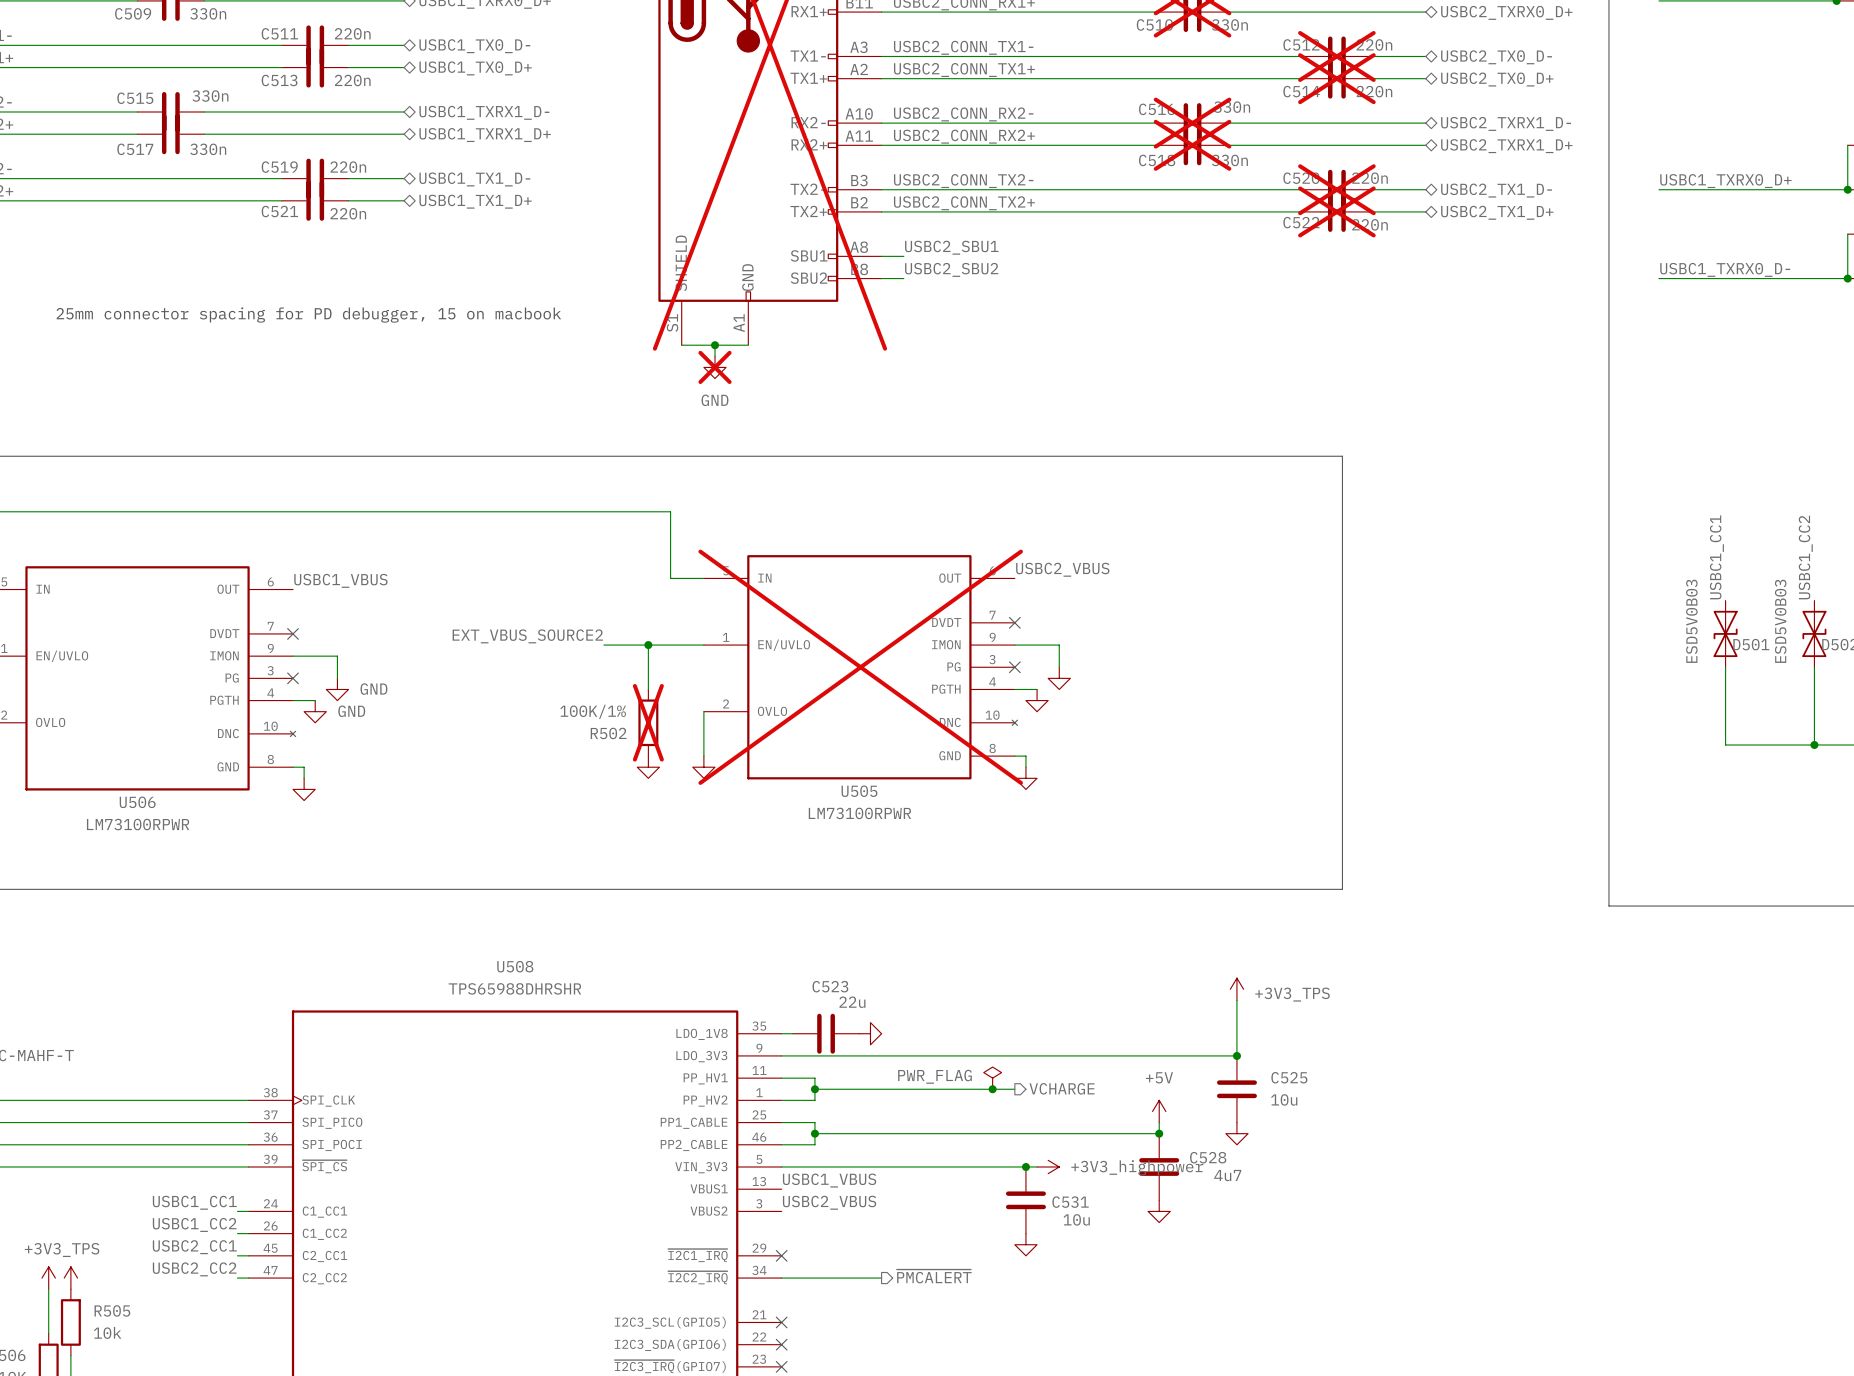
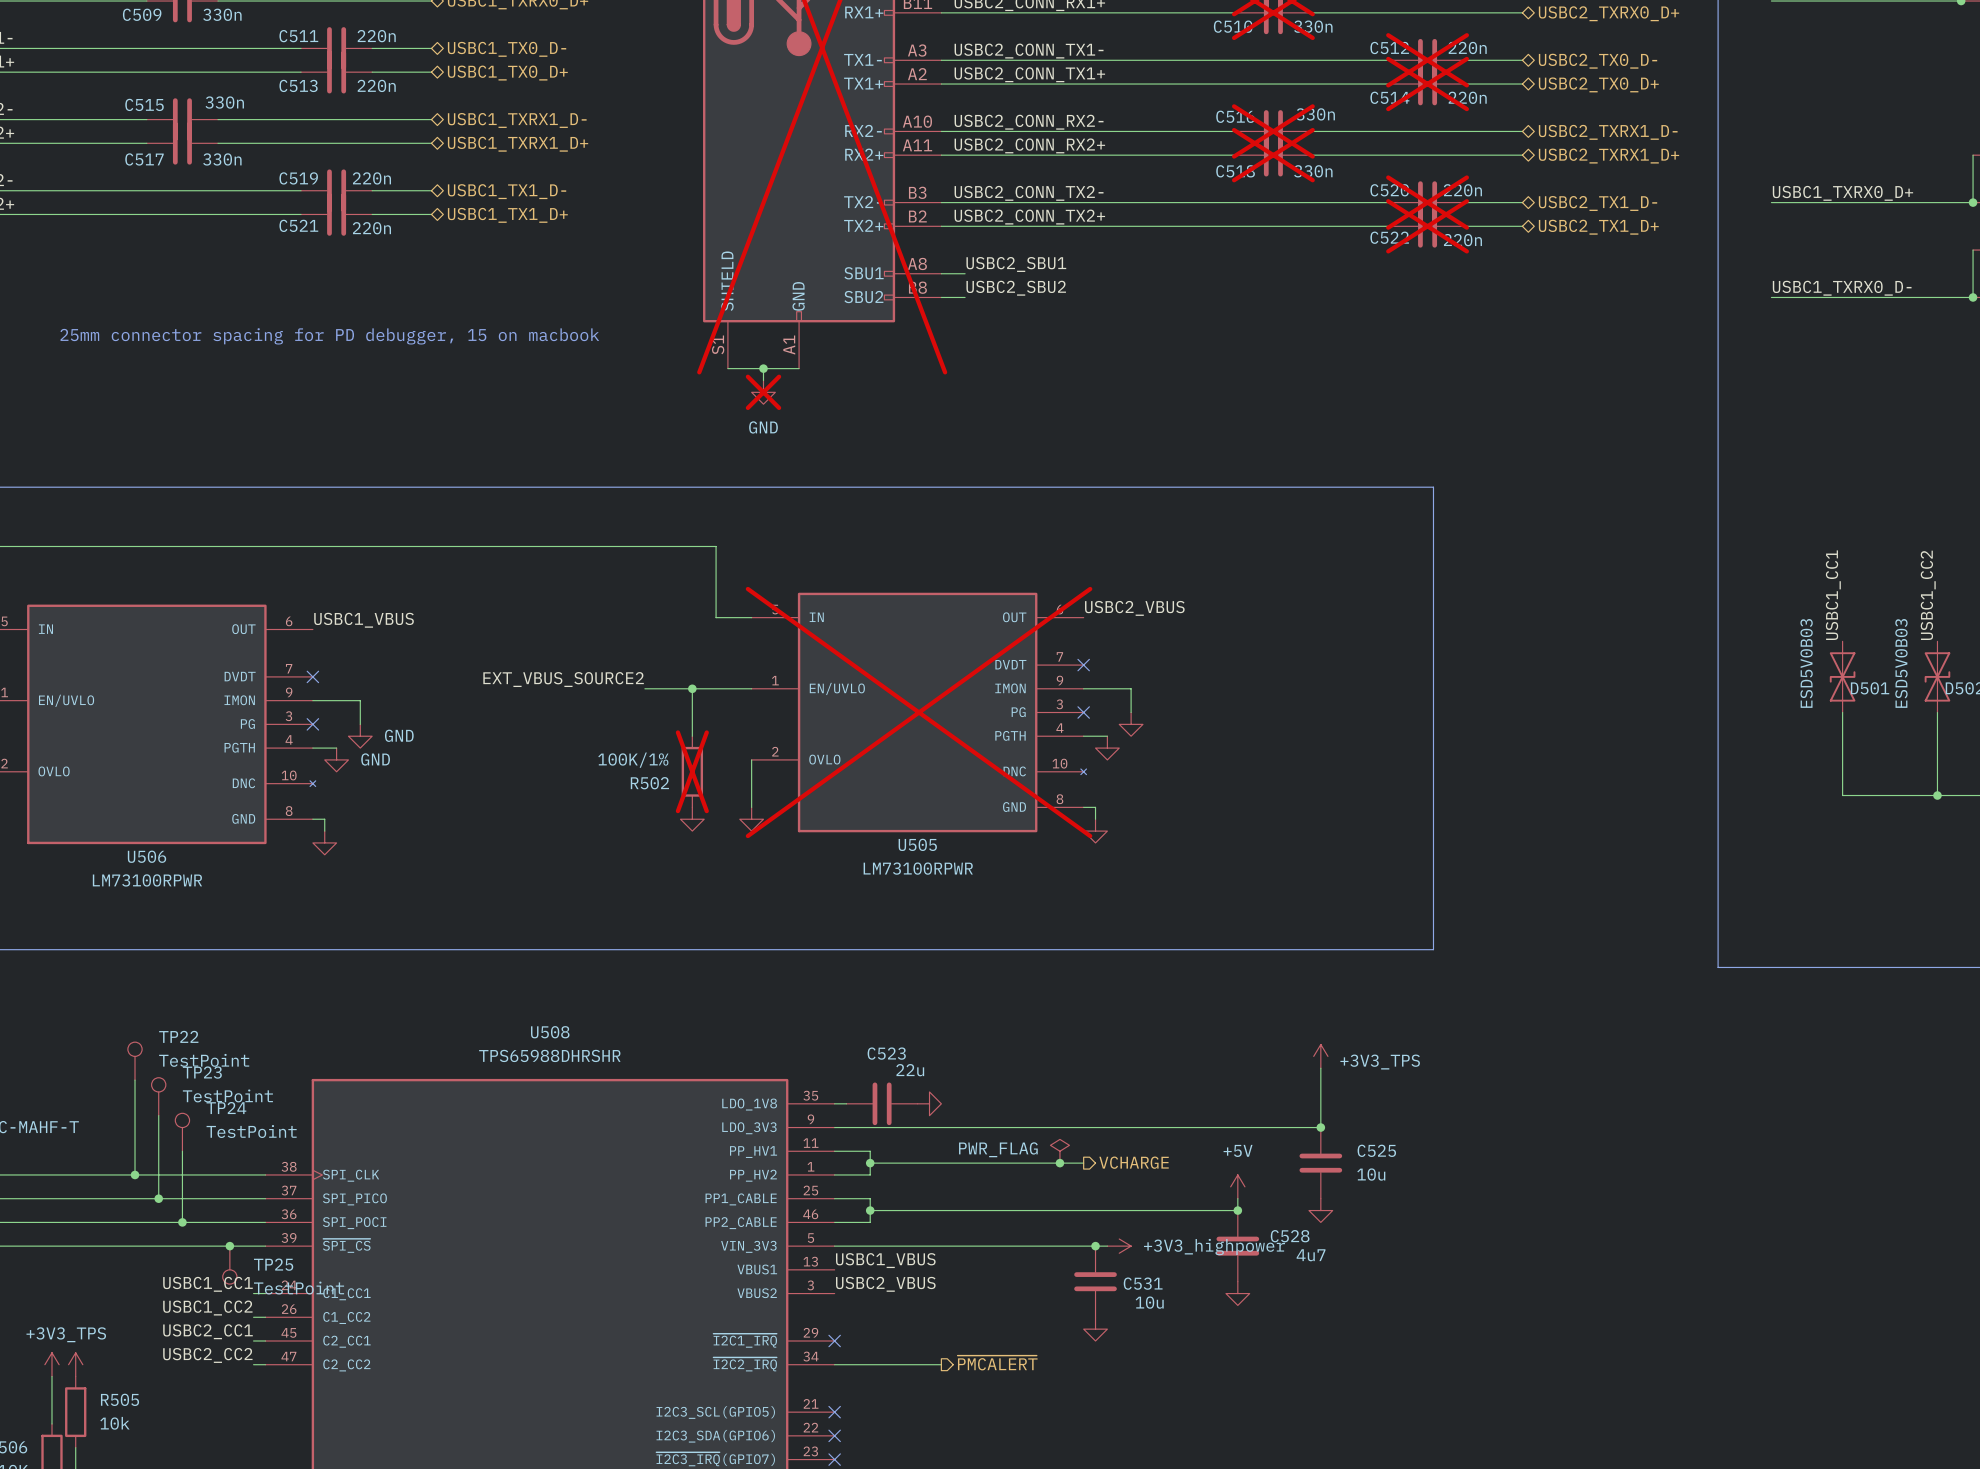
TP22: none -> TestPoint (135, 1061)
wire: none -> (135, 1080) (135, 1174)
TP23: none -> TestPoint (158, 1096)
wire: none -> (158, 1115) (158, 1198)
TP24: none -> TestPoint (182, 1132)
wire: none -> (182, 1151) (182, 1222)
junction: none -> (135, 1174)
junction: none -> (158, 1198)
junction: none -> (182, 1222)
junction: none -> (229, 1246)
TP25: none -> TestPoint (229, 1265)

